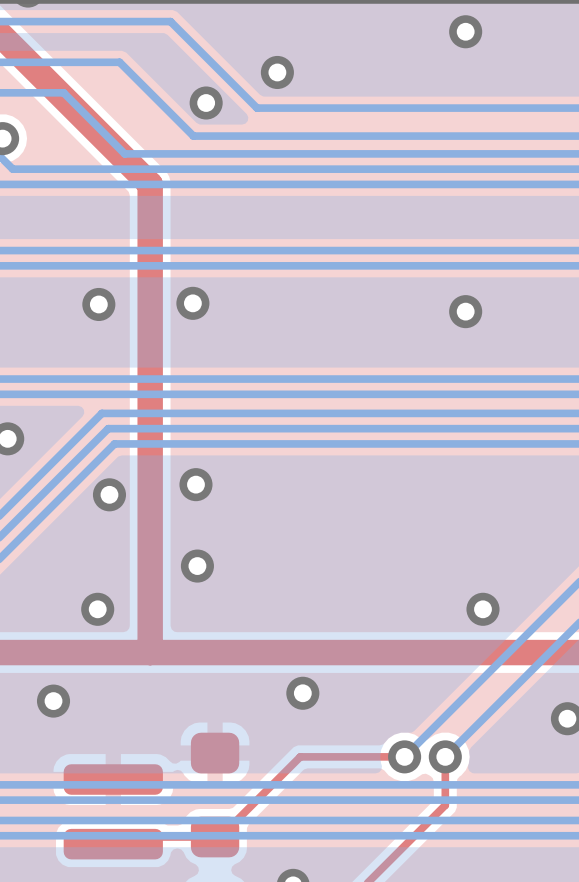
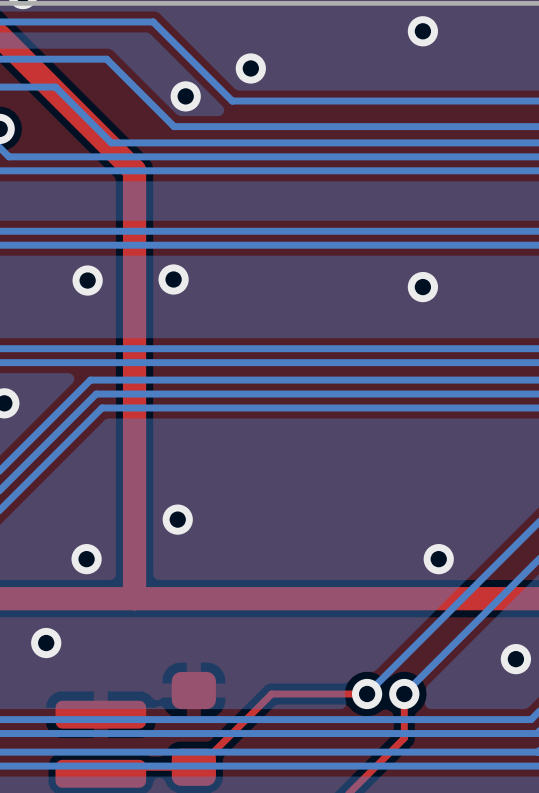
via: (195, 484) -> none
via: (109, 494) -> none
via: (302, 693) -> none

